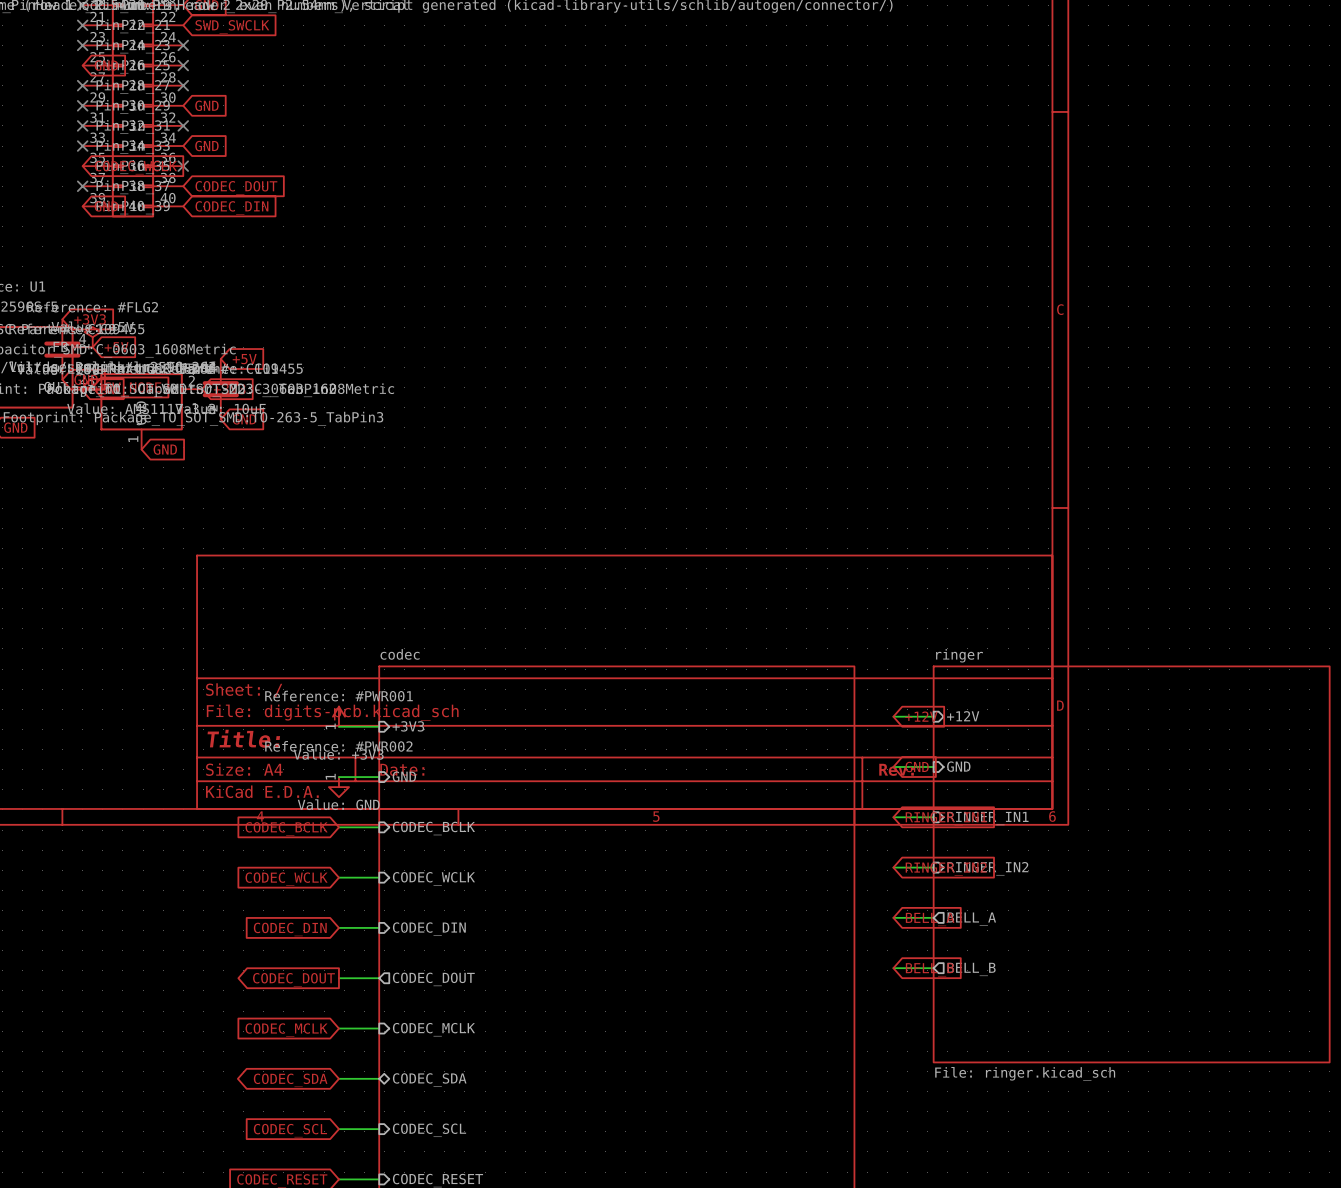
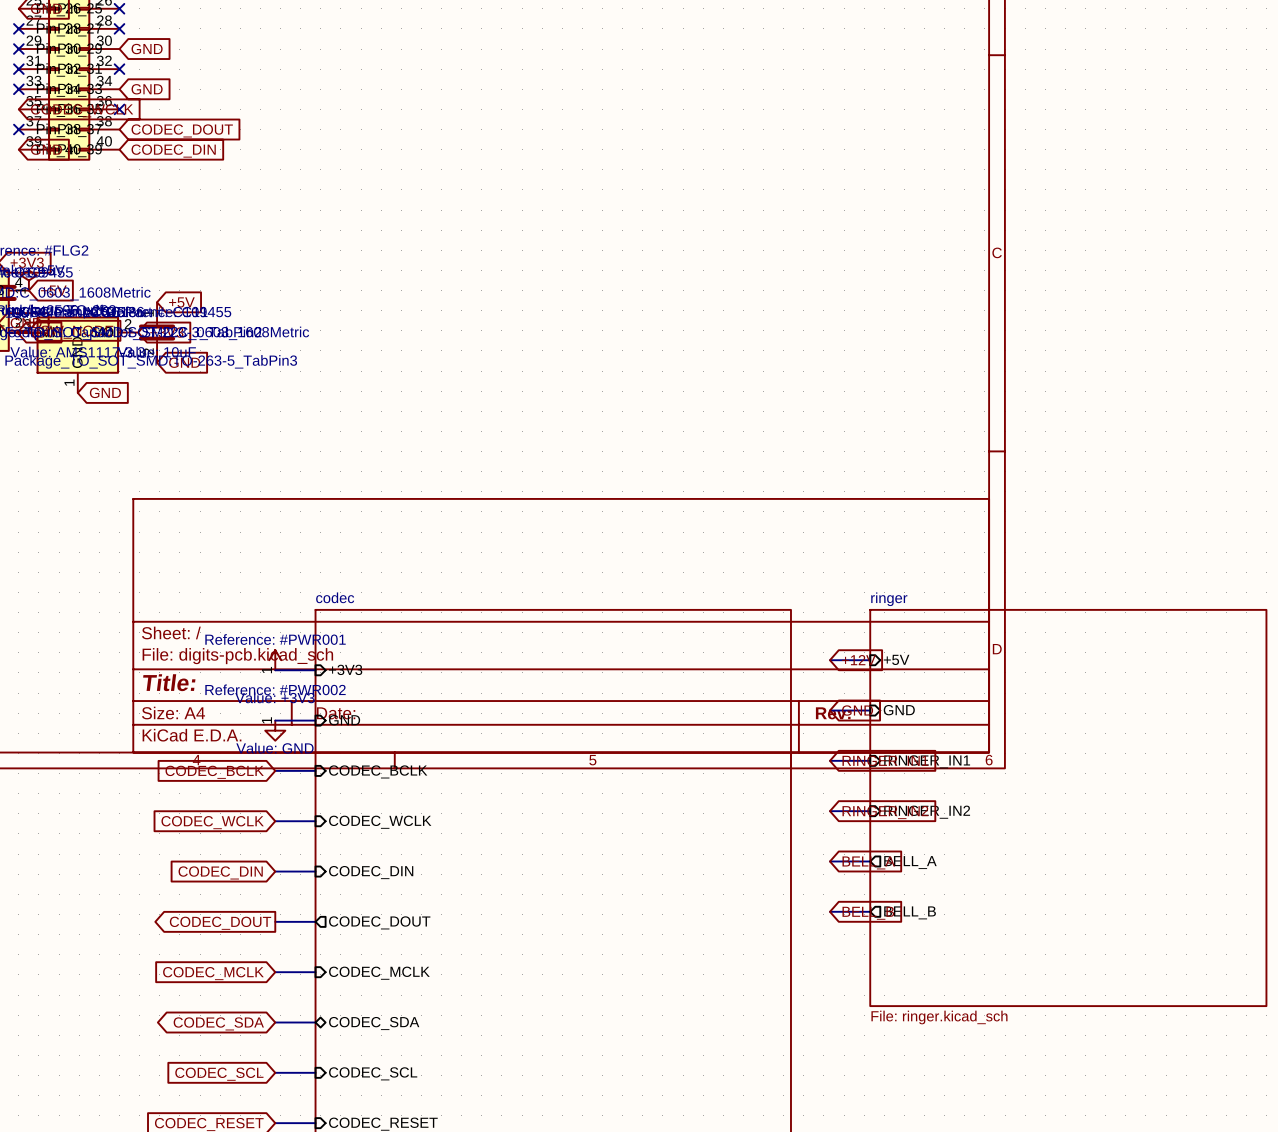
sheet pin: +12V (963, 716) -> +5V (896, 659)

